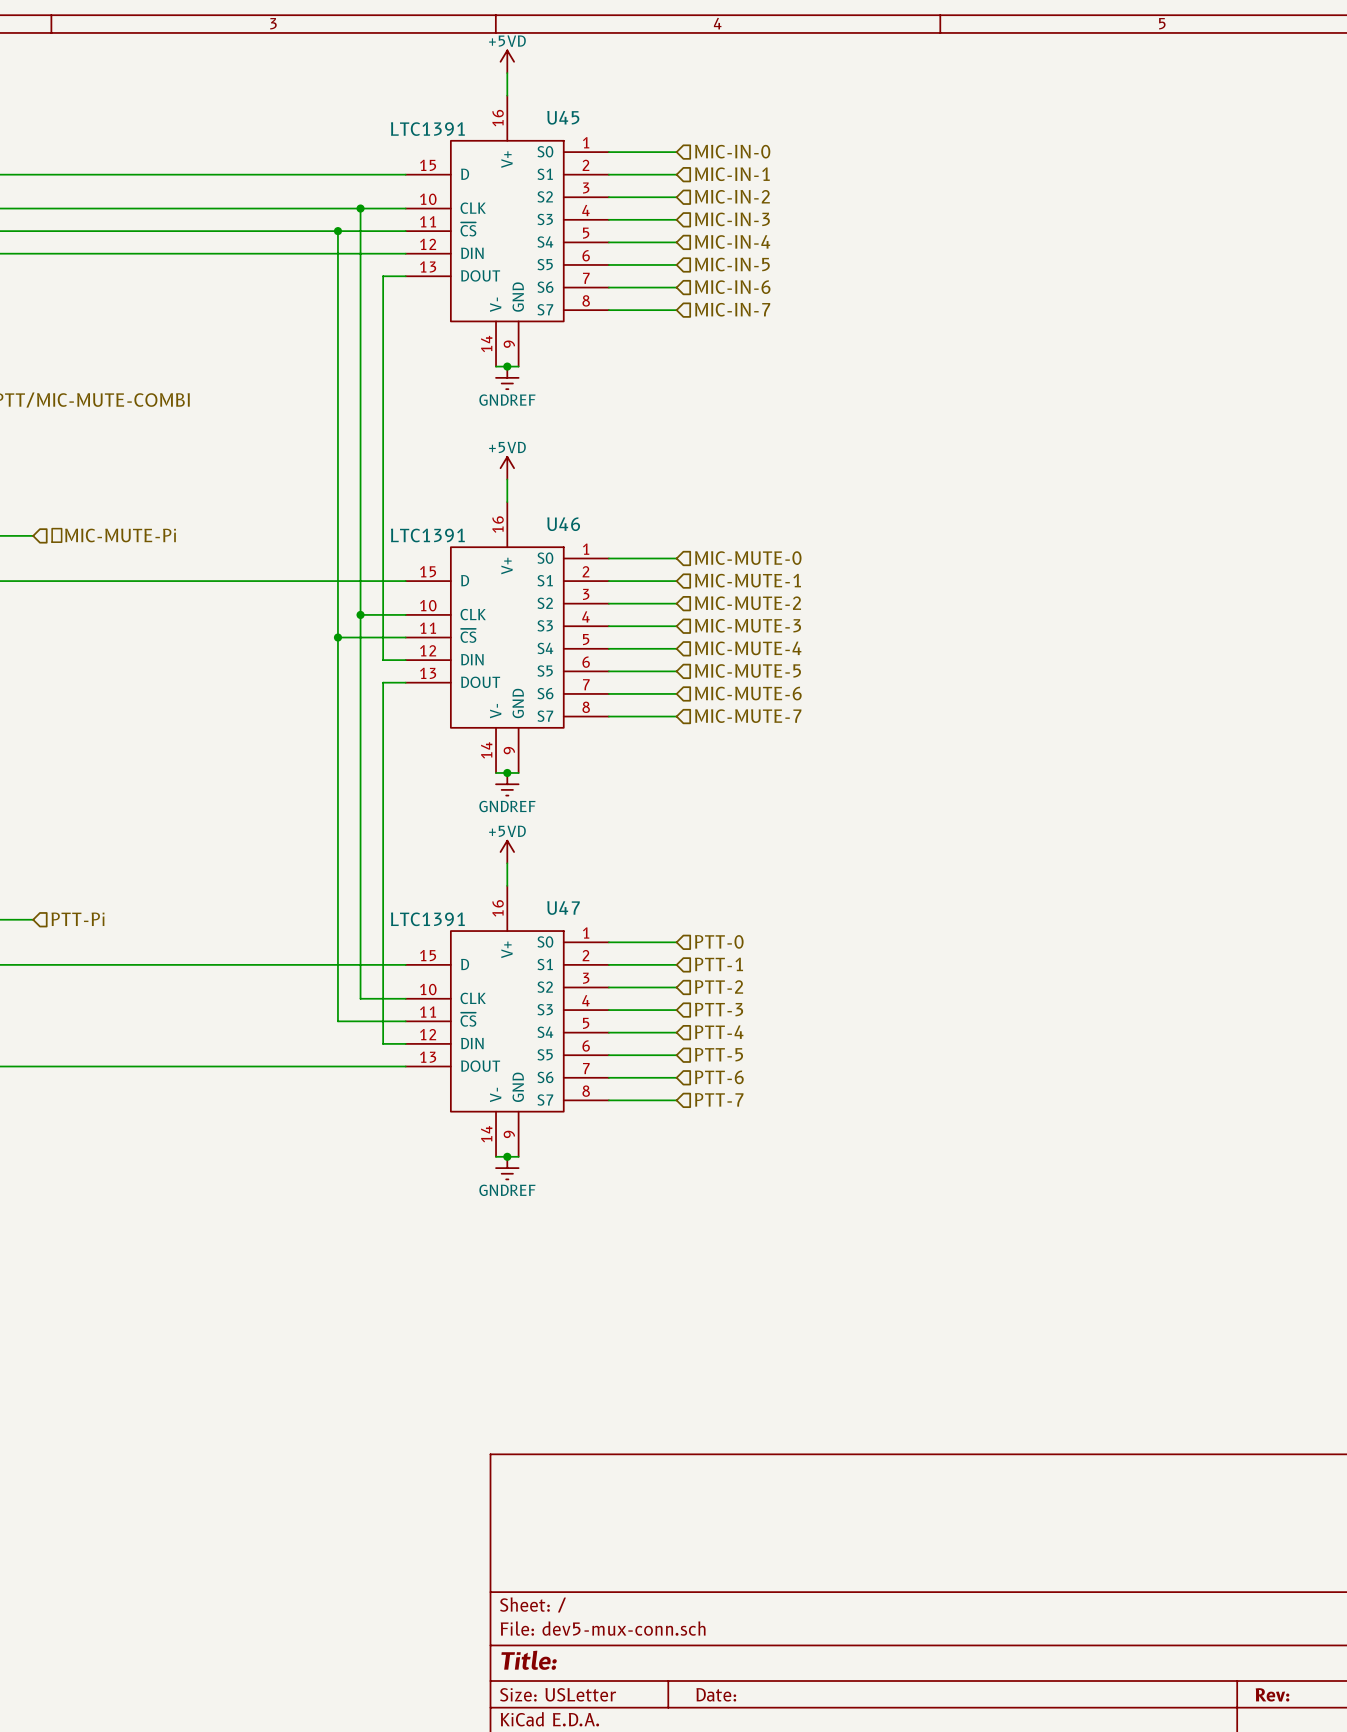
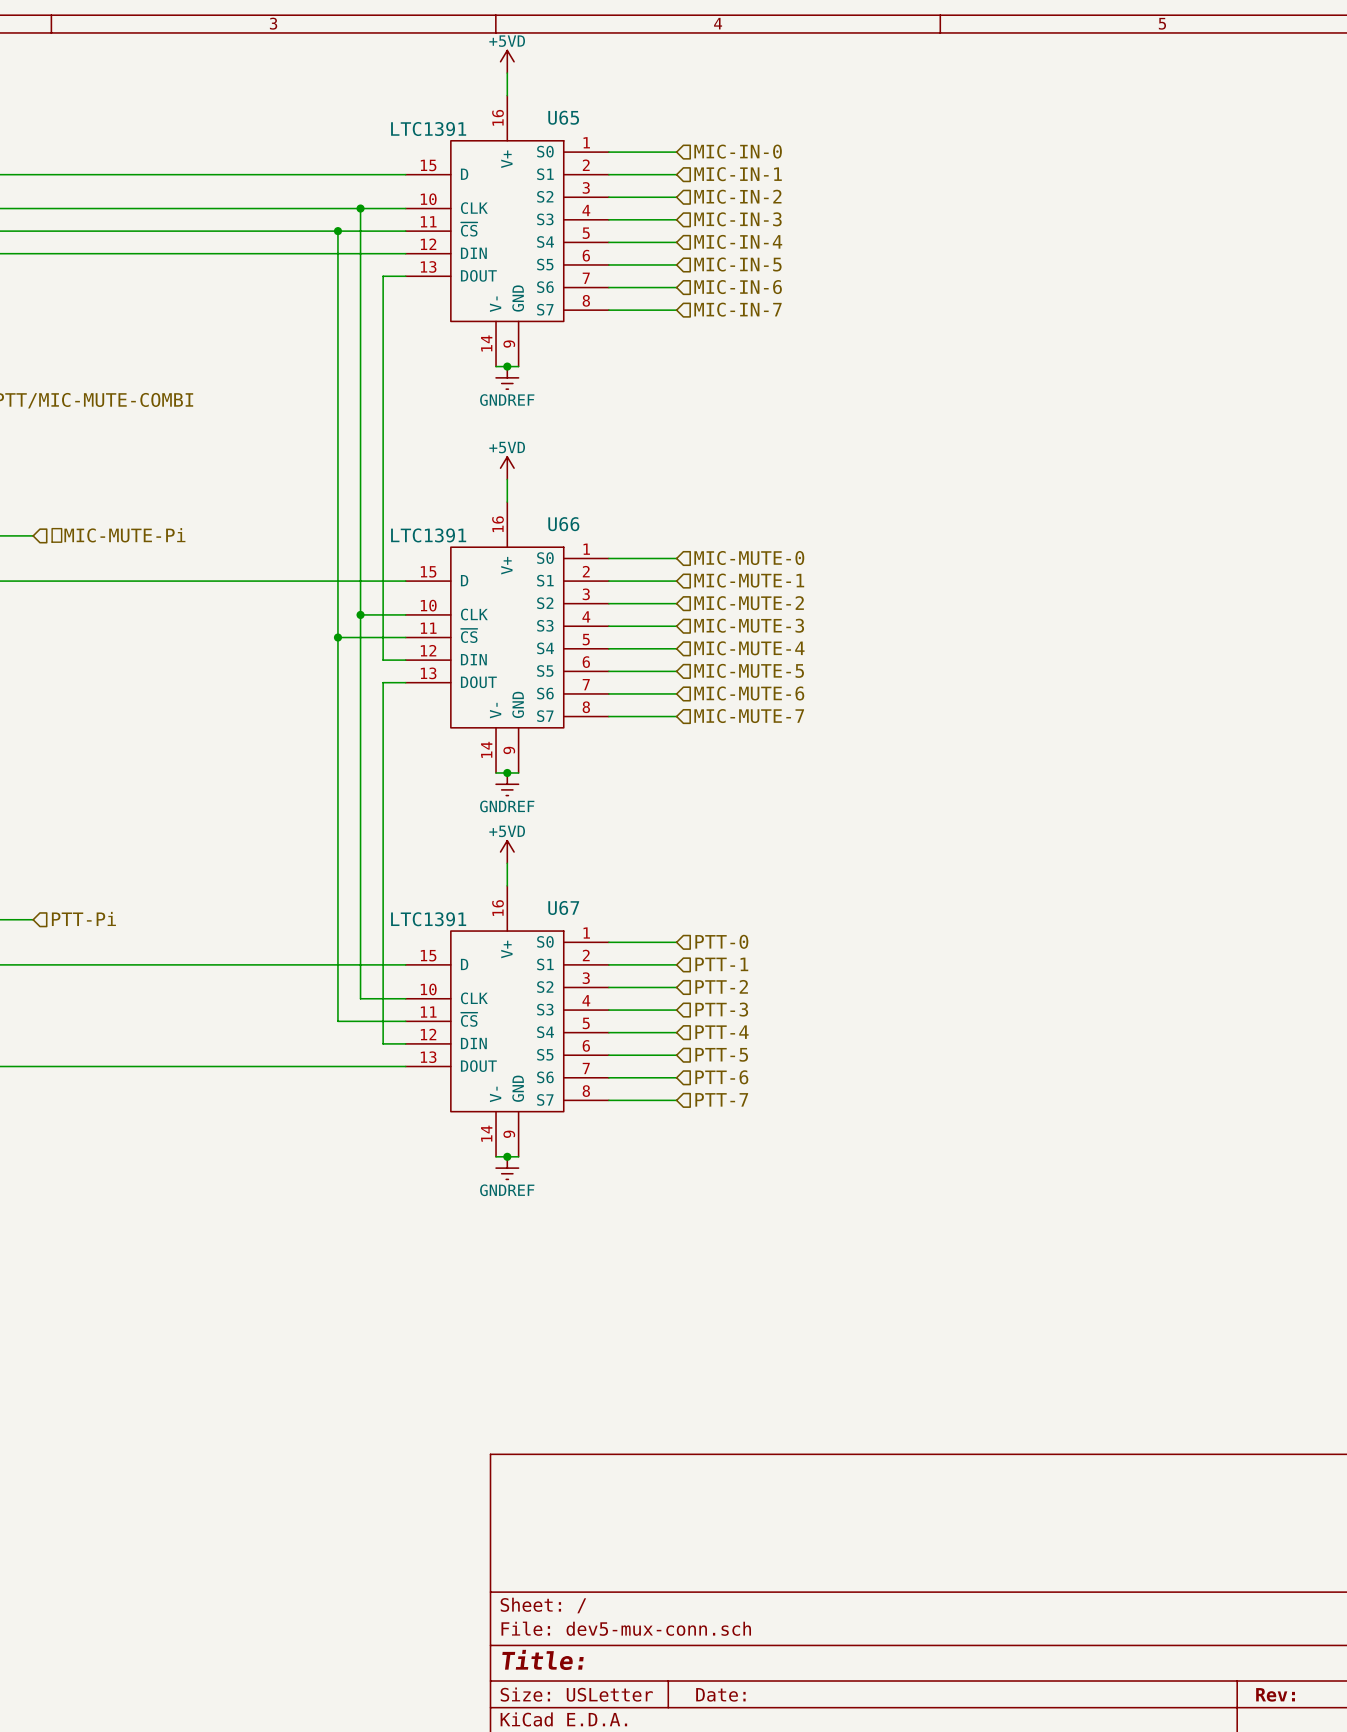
U45 name: U45 (563, 117) -> U65 (563, 117)
U46 name: U46 (563, 524) -> U66 (563, 524)
U47 name: U47 (563, 908) -> U67 (563, 907)

